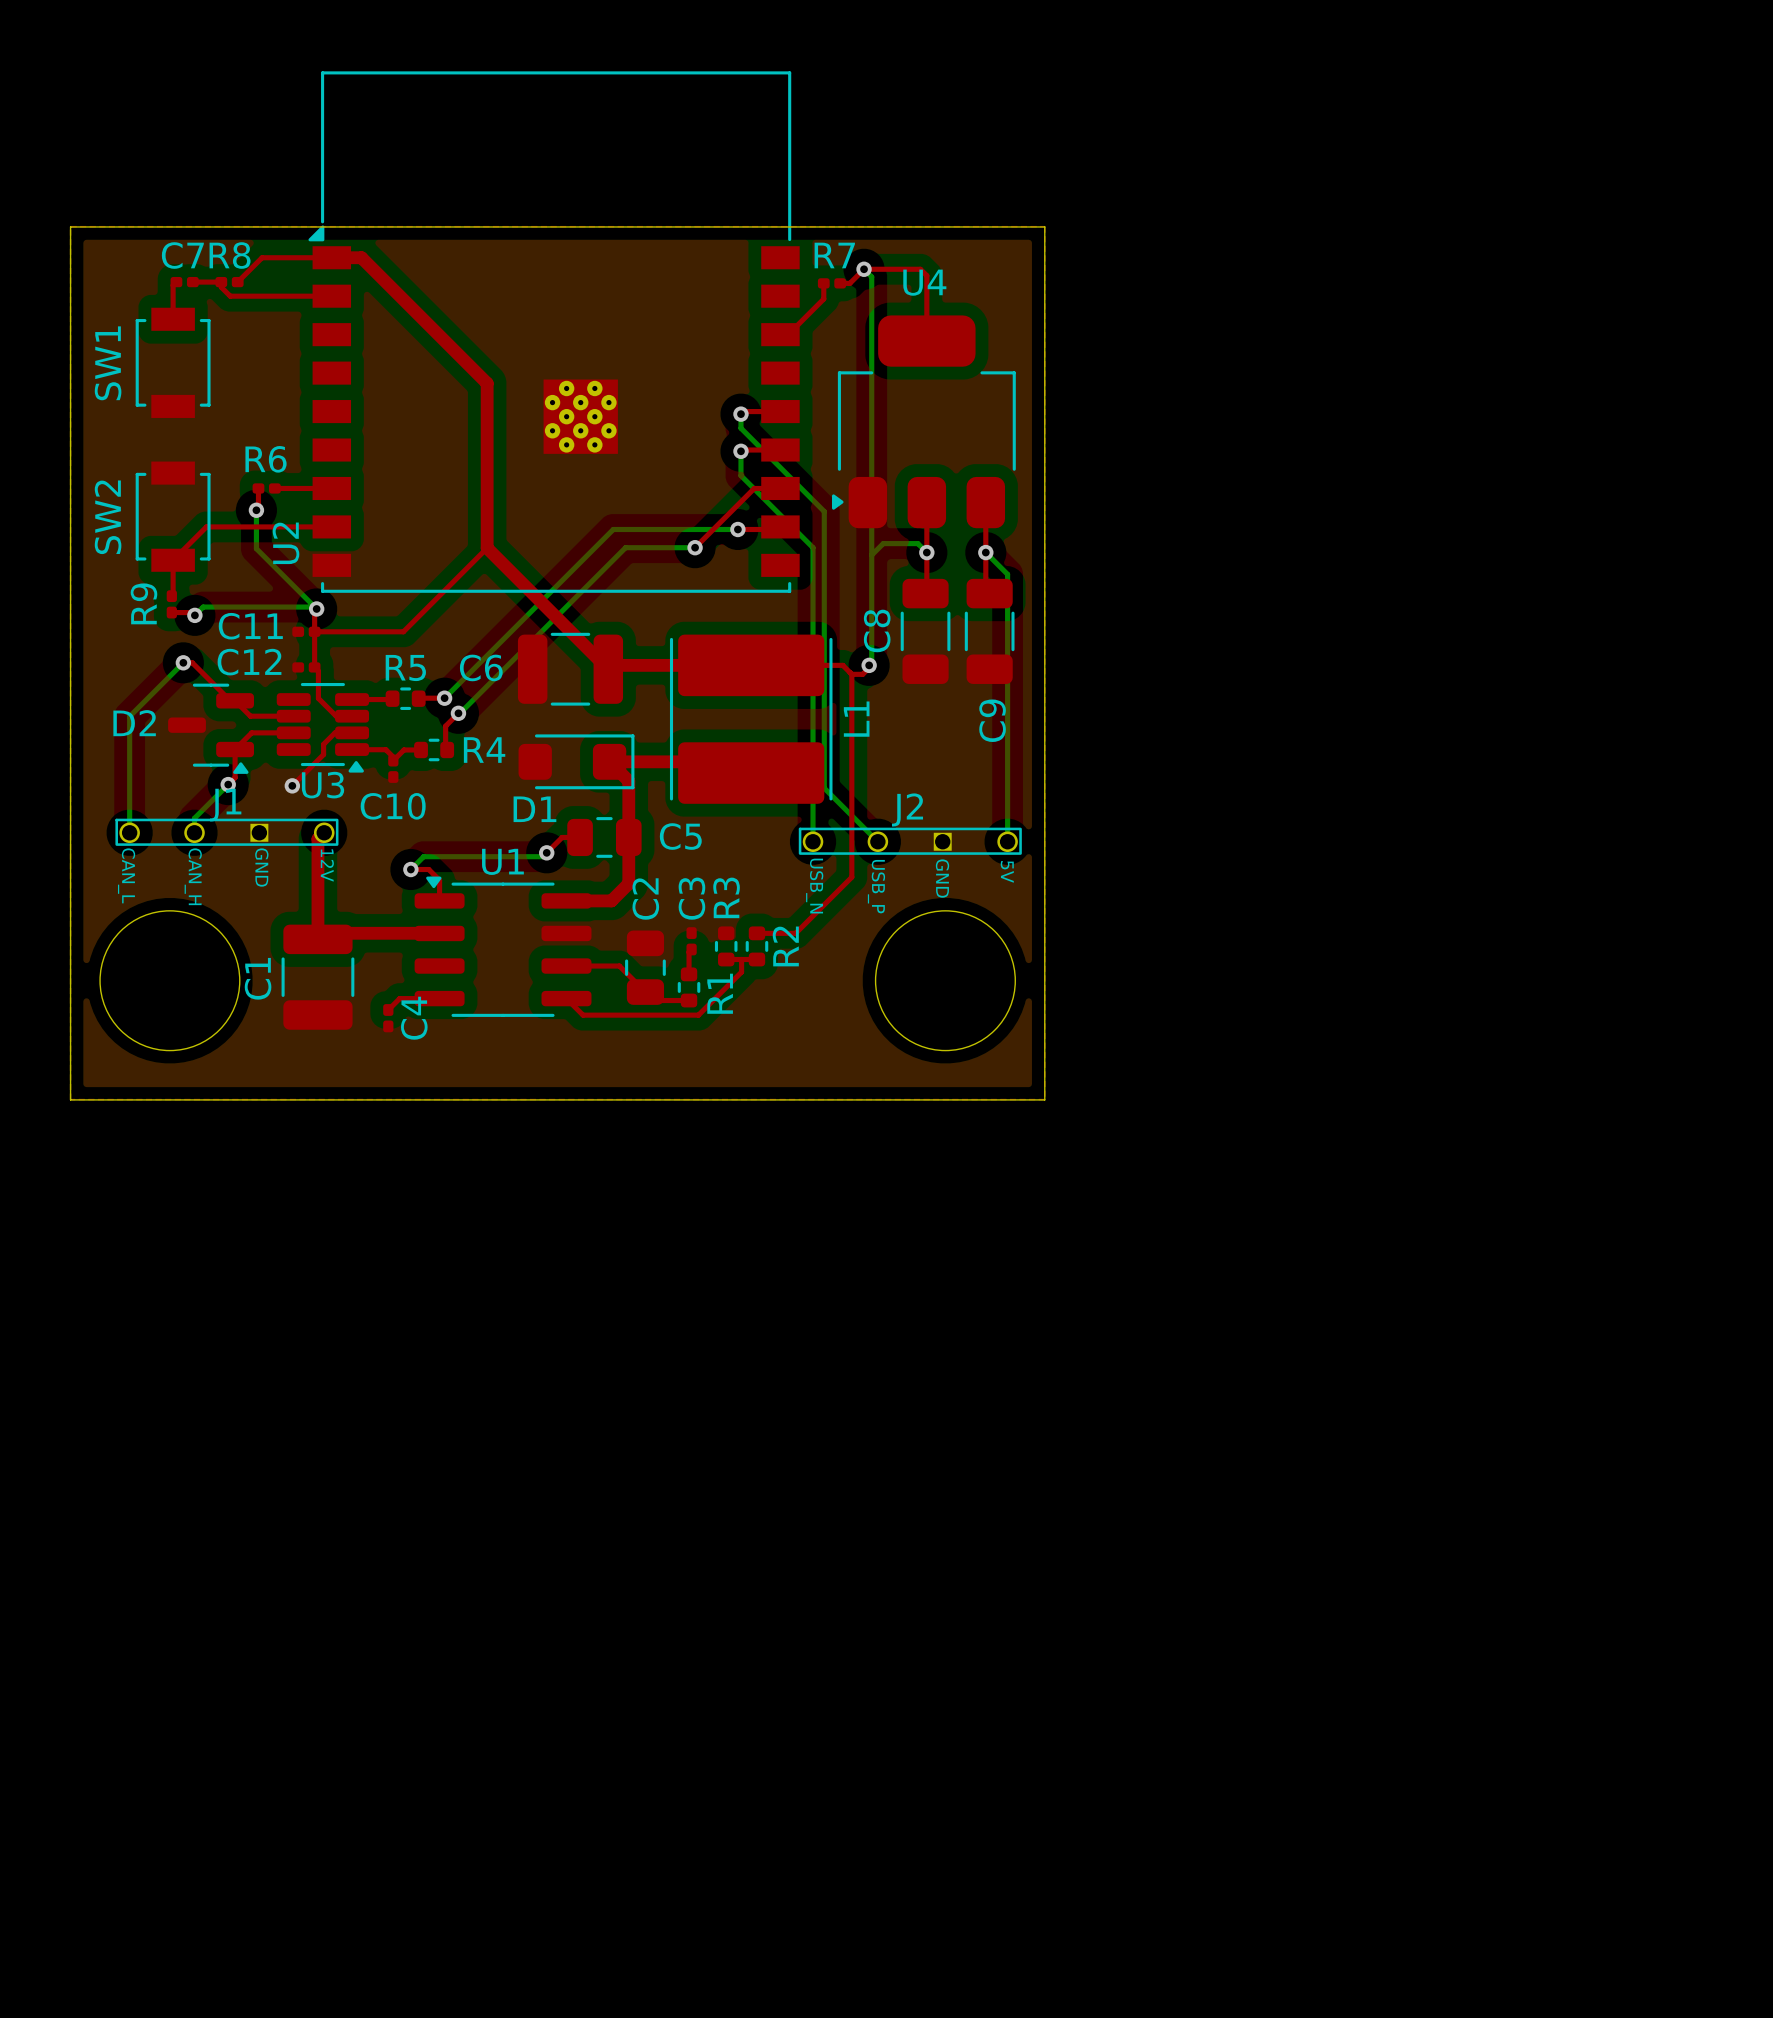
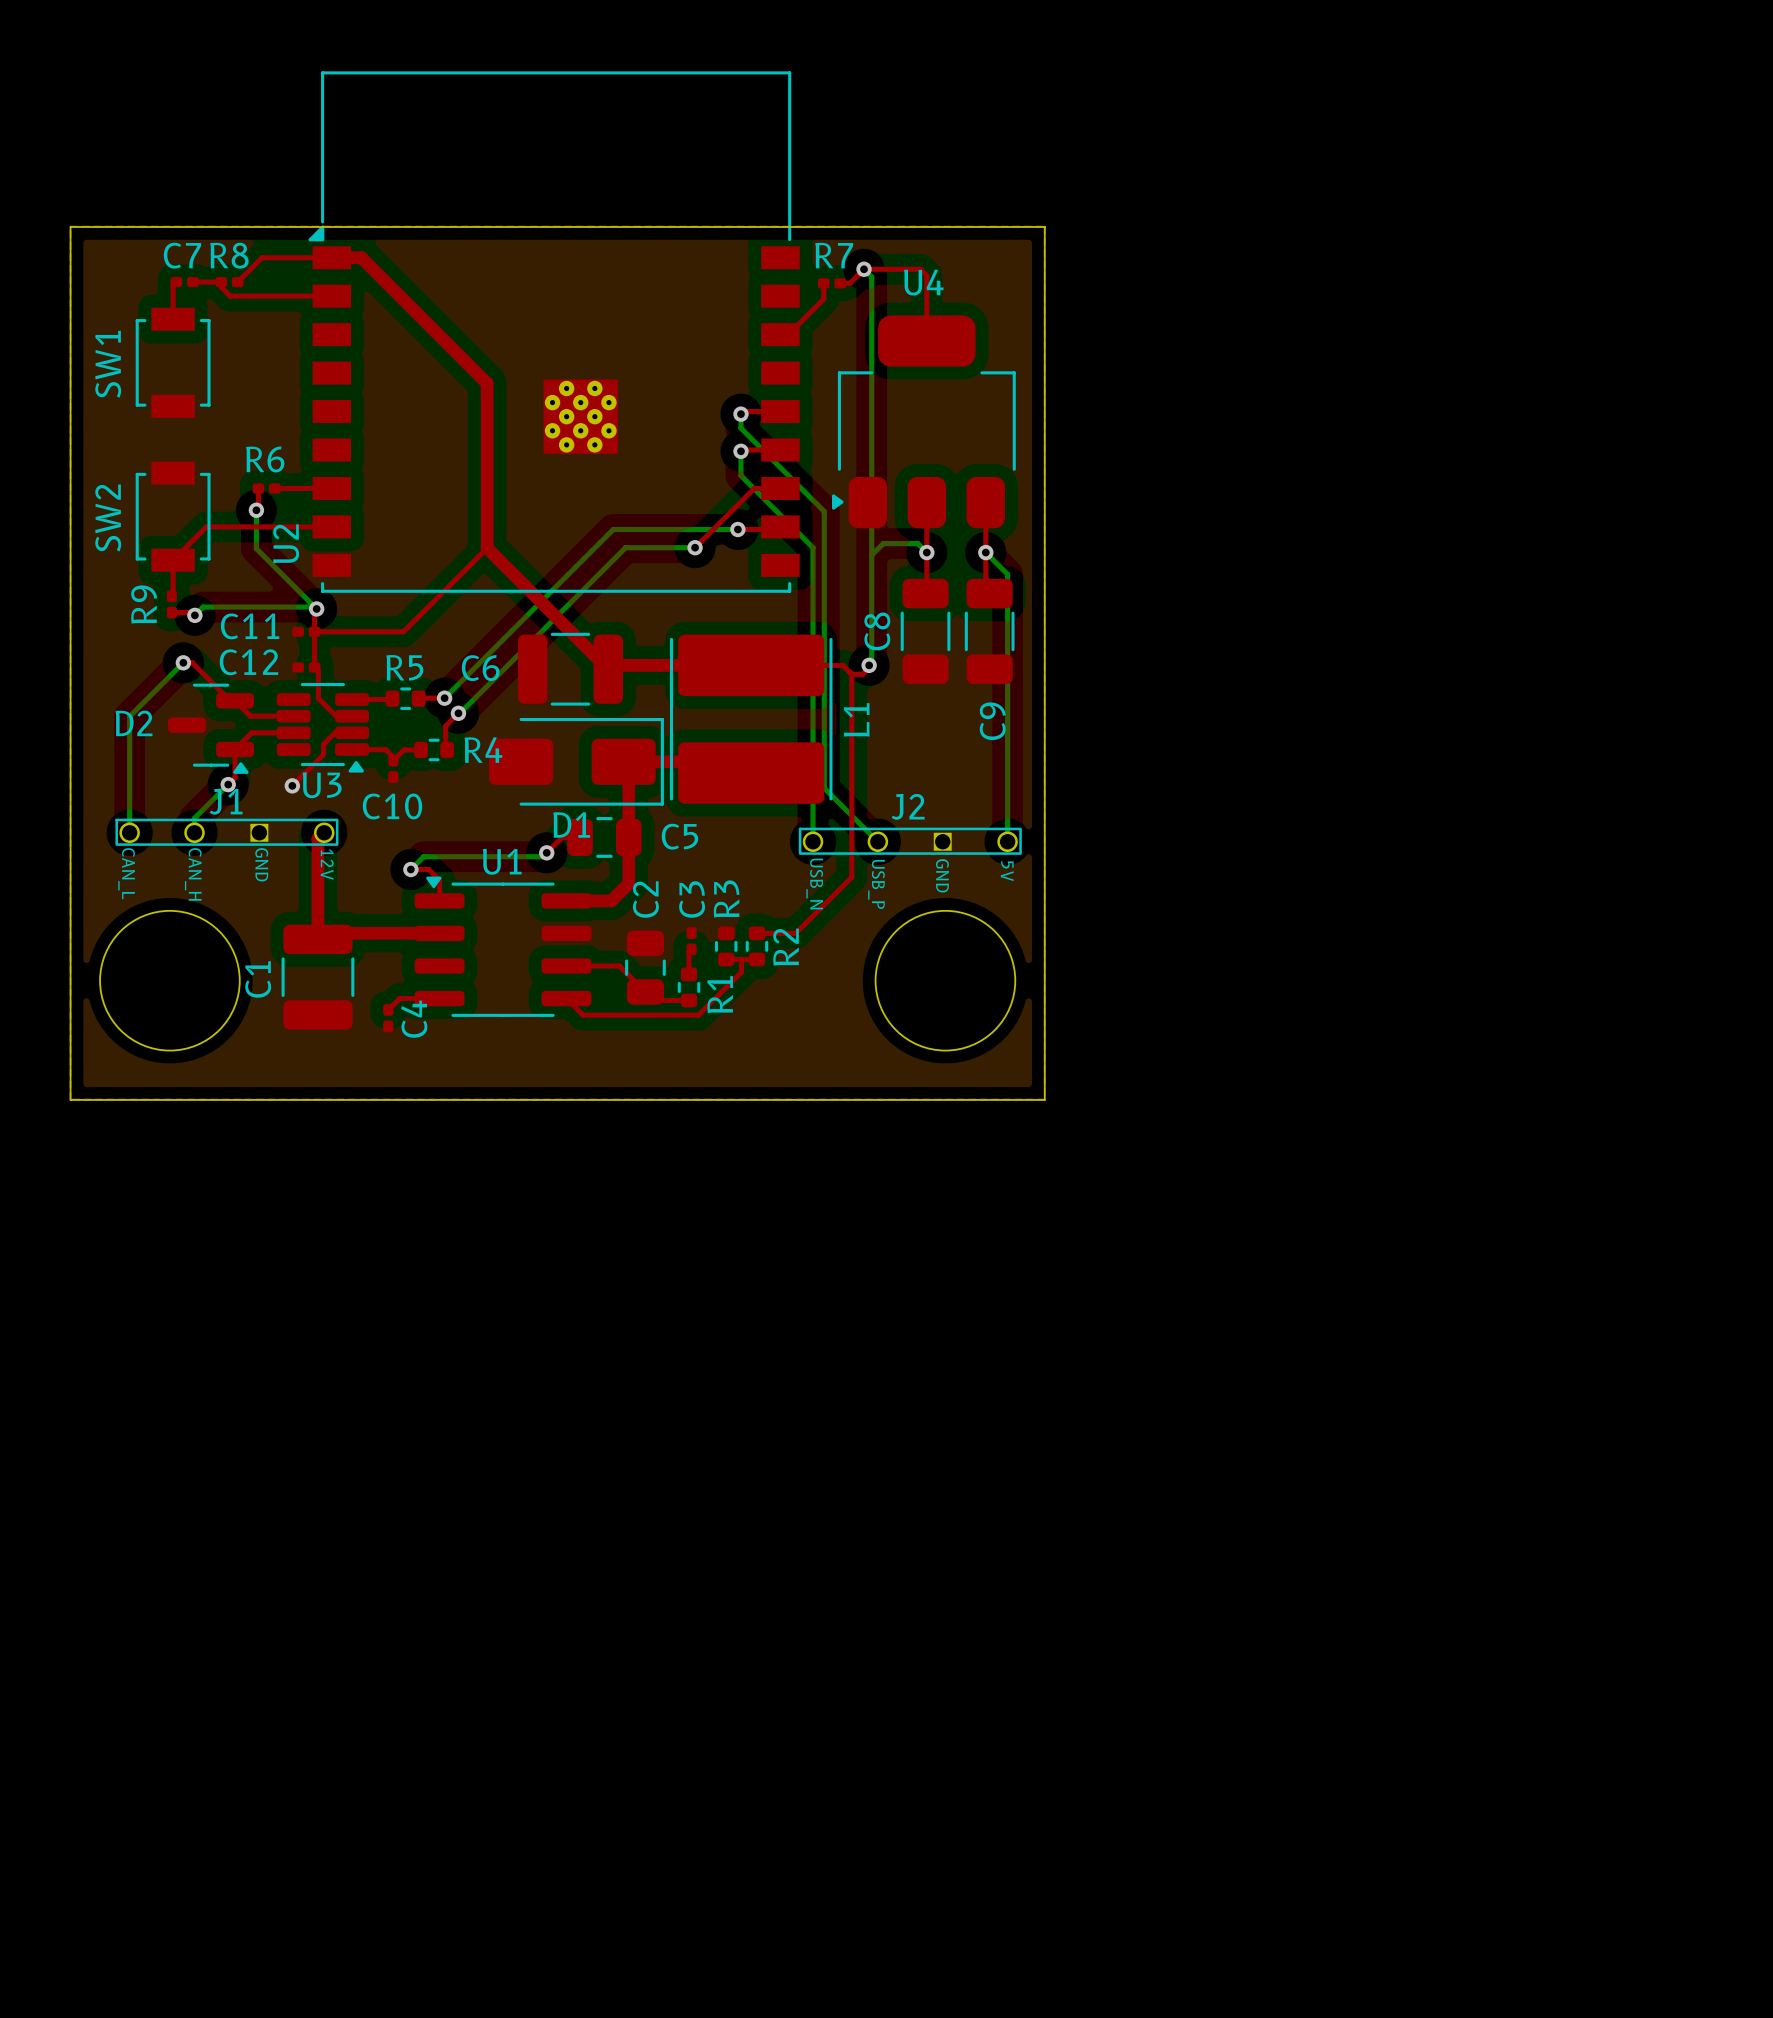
D1 footprint: [518, 734, 635, 790] -> [489, 717, 664, 806]

